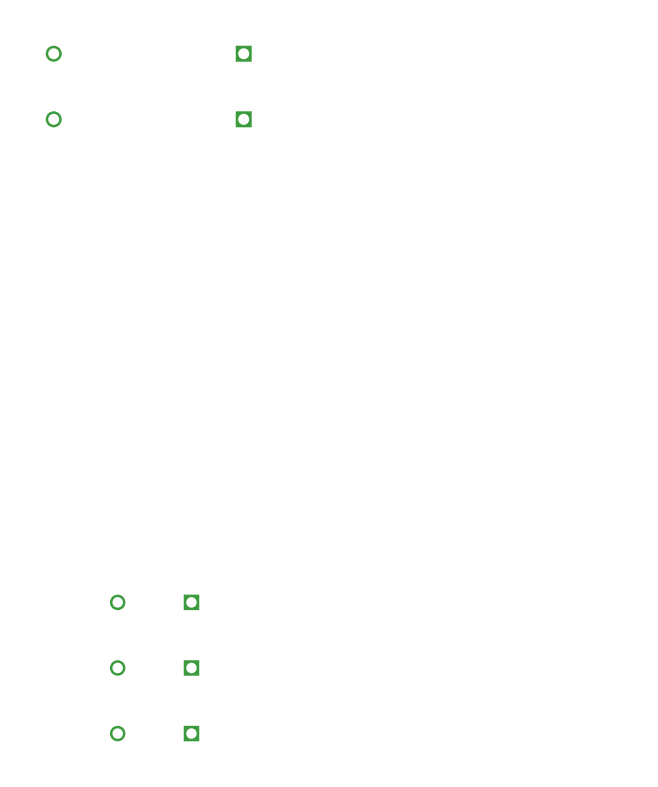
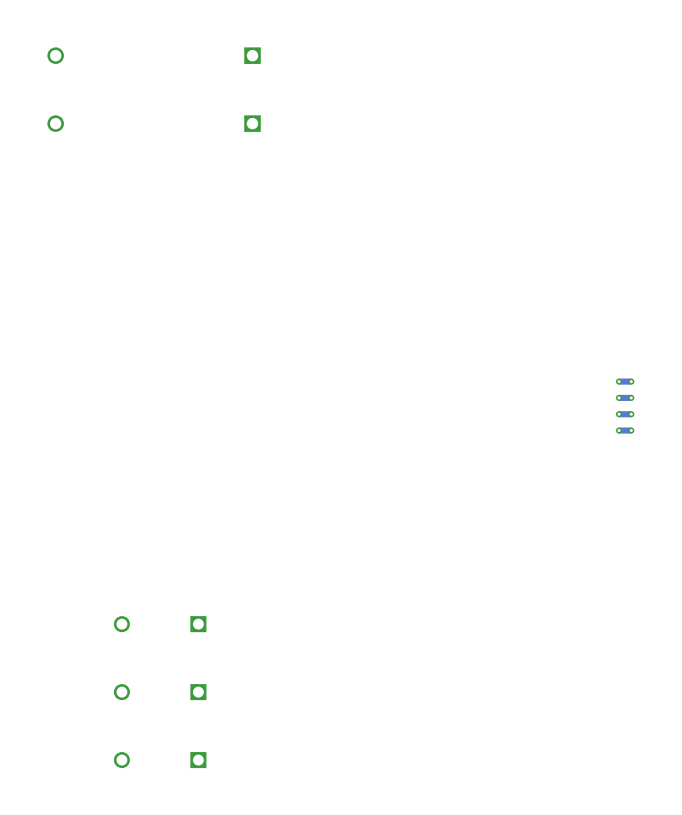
part: none -> (625, 381)
part: none -> (625, 397)
part: none -> (625, 414)
part: none -> (625, 430)

